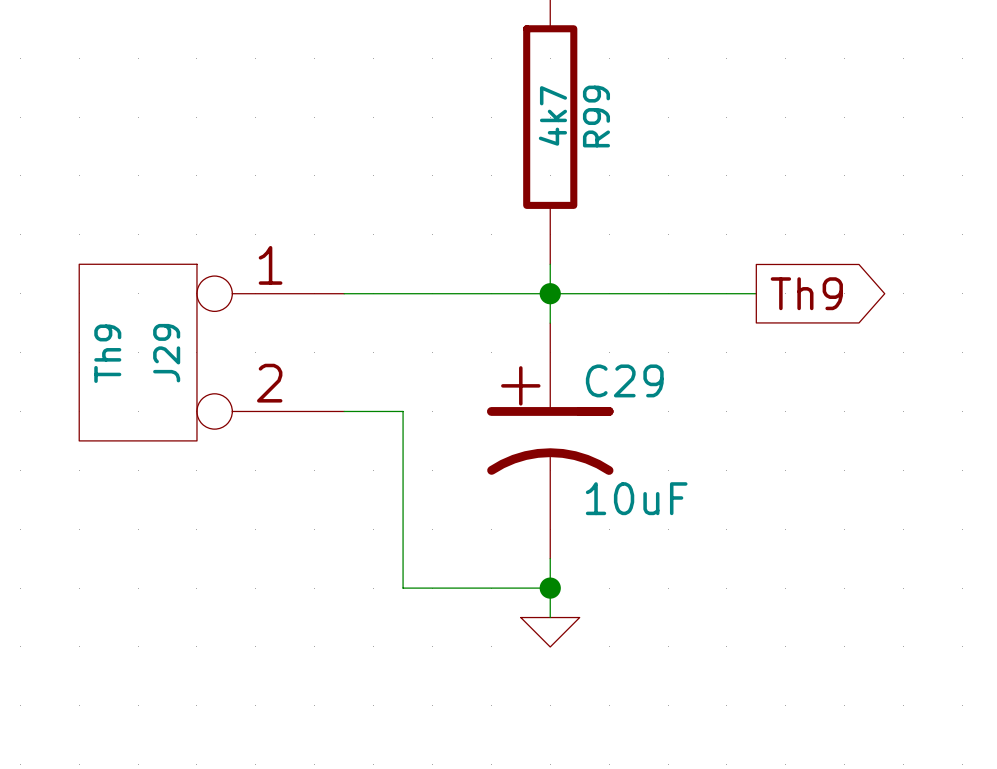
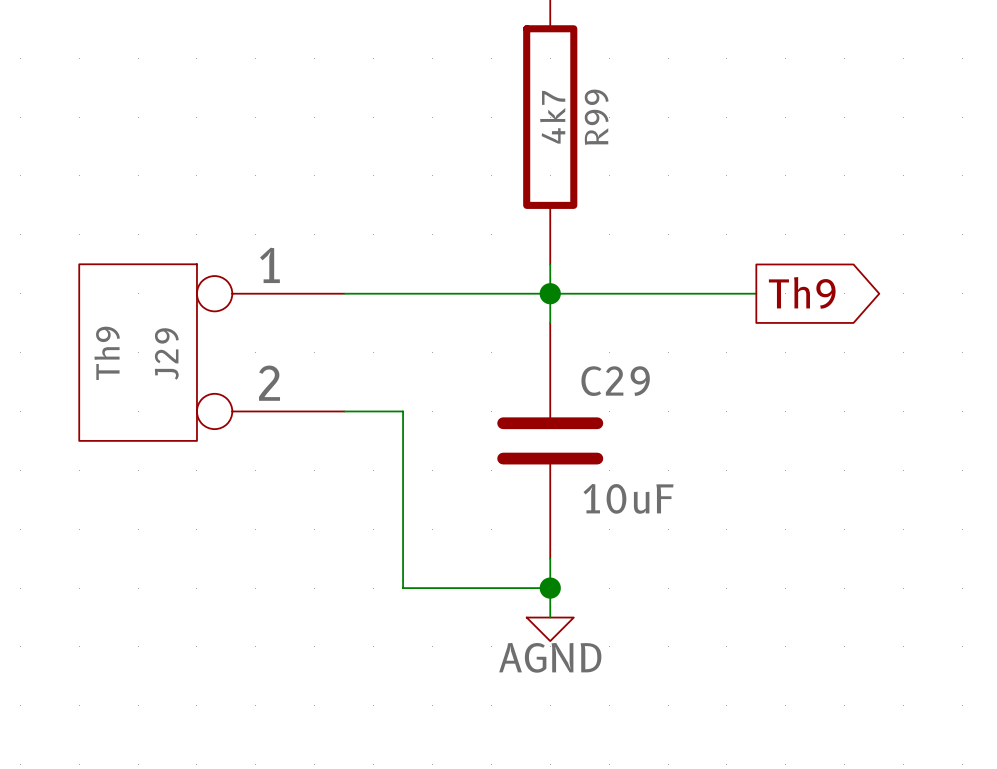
C29 symbol: [486, 323, 614, 559] -> [497, 323, 604, 559]
power symbol shape: [520, 617, 580, 647] -> [526, 617, 574, 642]
power symbol text: none -> AGND (550, 657)

